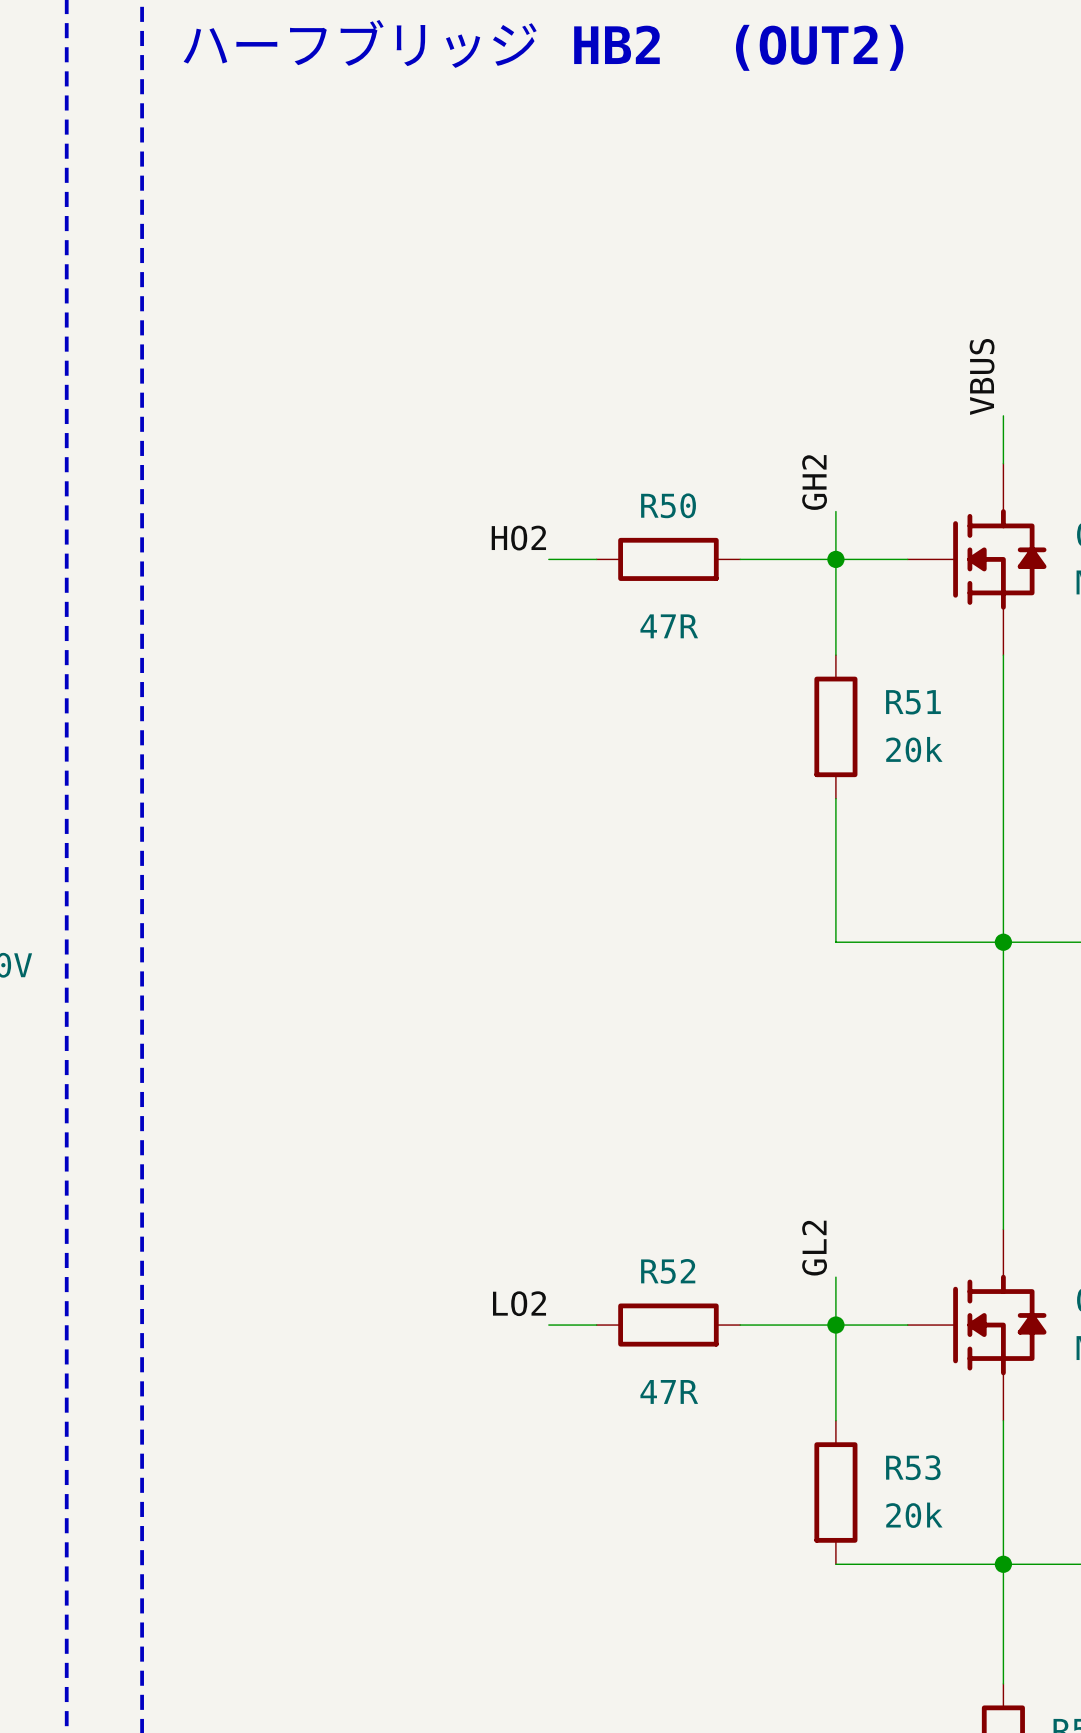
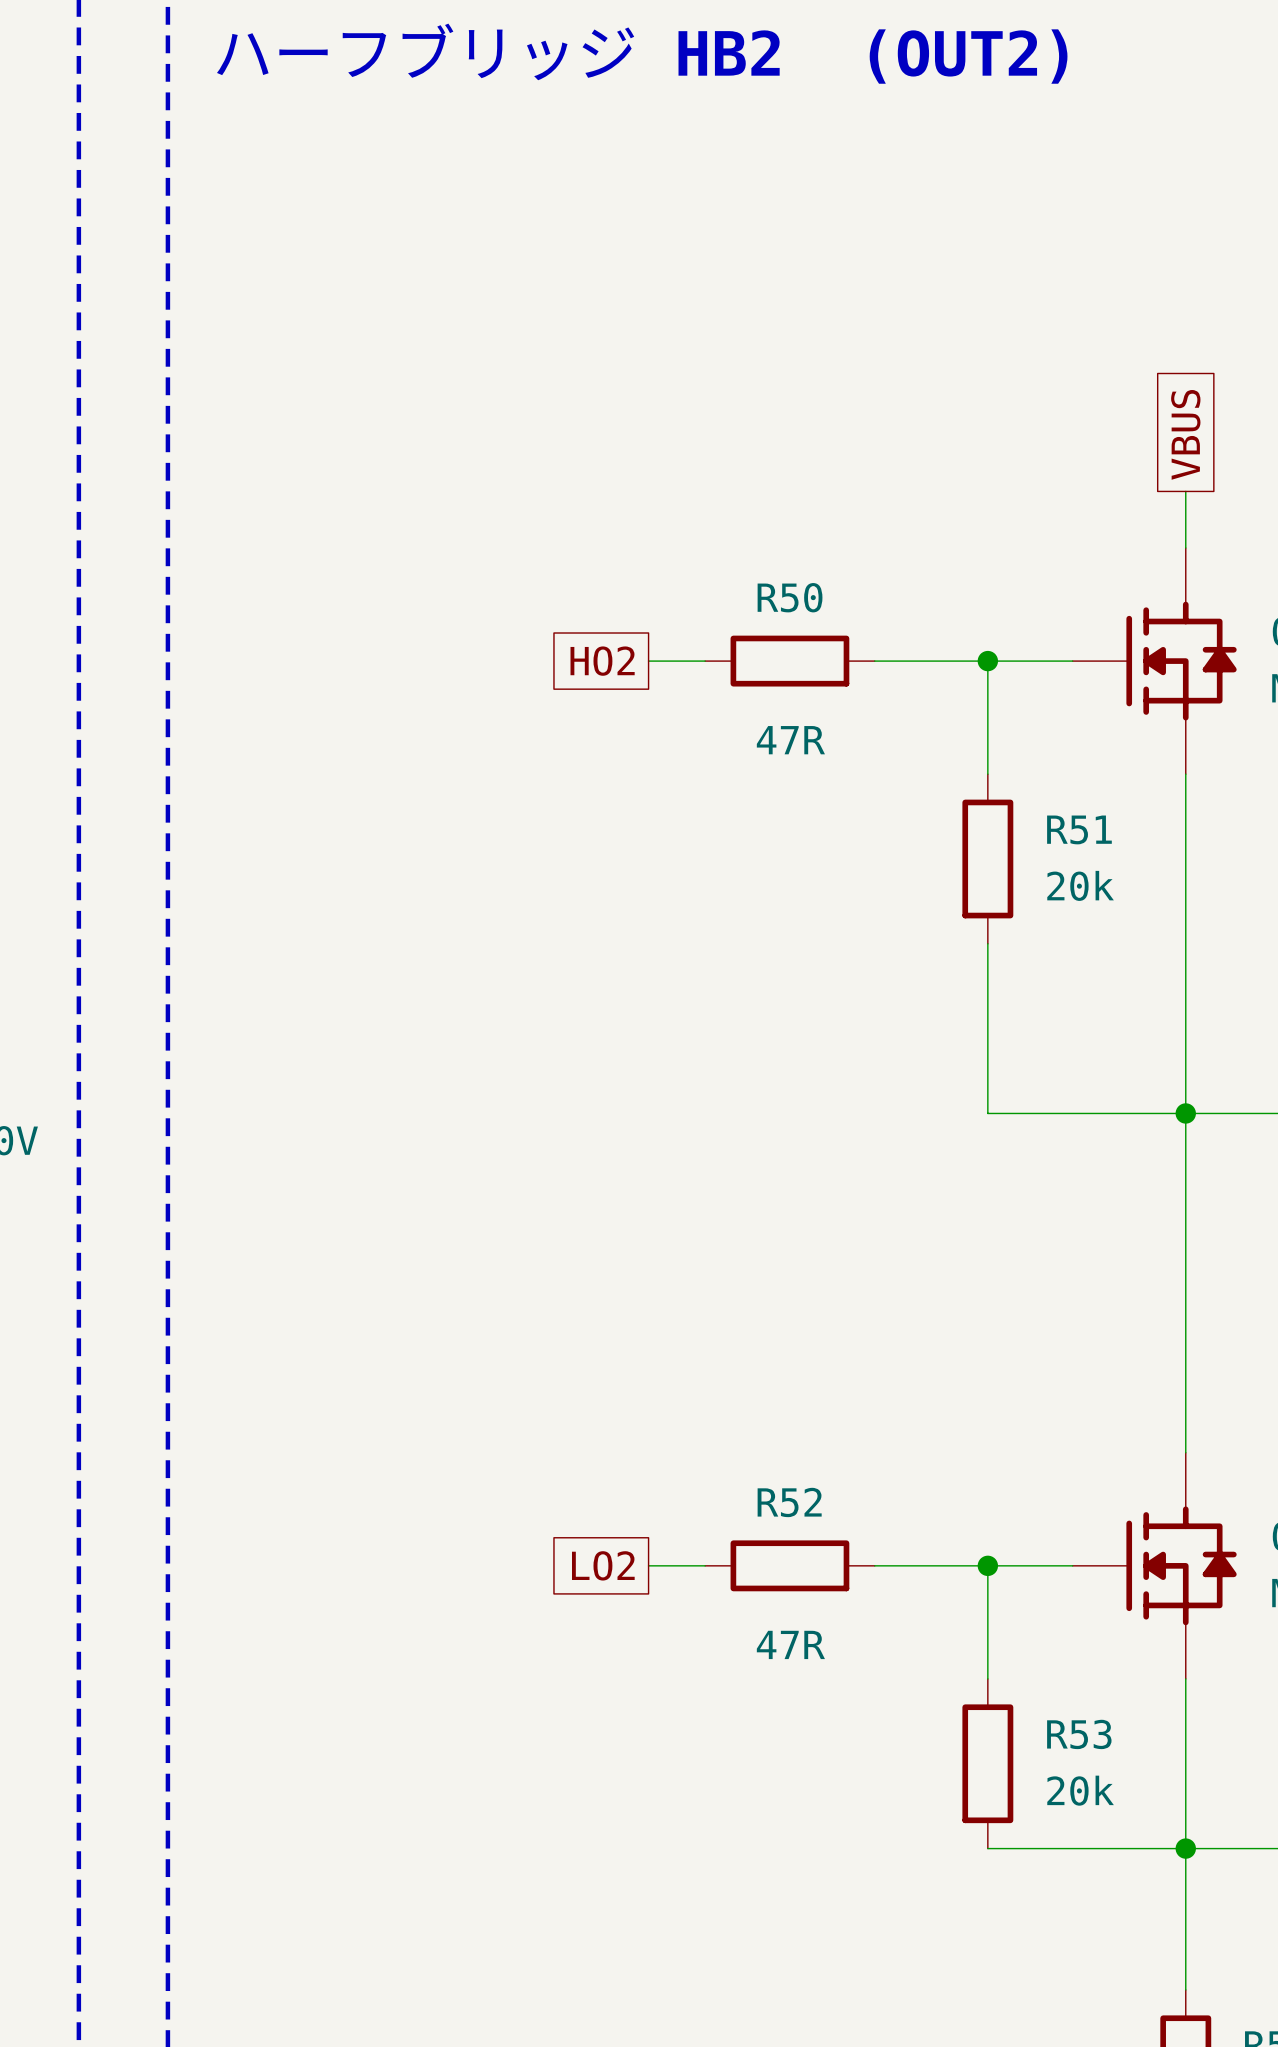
global label: none -> VBUS (1185, 434)
label: VBUS (982, 376) -> none
label: GH2 (814, 482) -> none
wire: (835, 511) (835, 559) -> none
label: HO2 (518, 538) -> none
global label: none -> HO2 (602, 661)
label: GL2 (814, 1248) -> none
wire: (835, 1277) (835, 1325) -> none
label: LO2 (519, 1303) -> none
global label: none -> LO2 (603, 1565)

